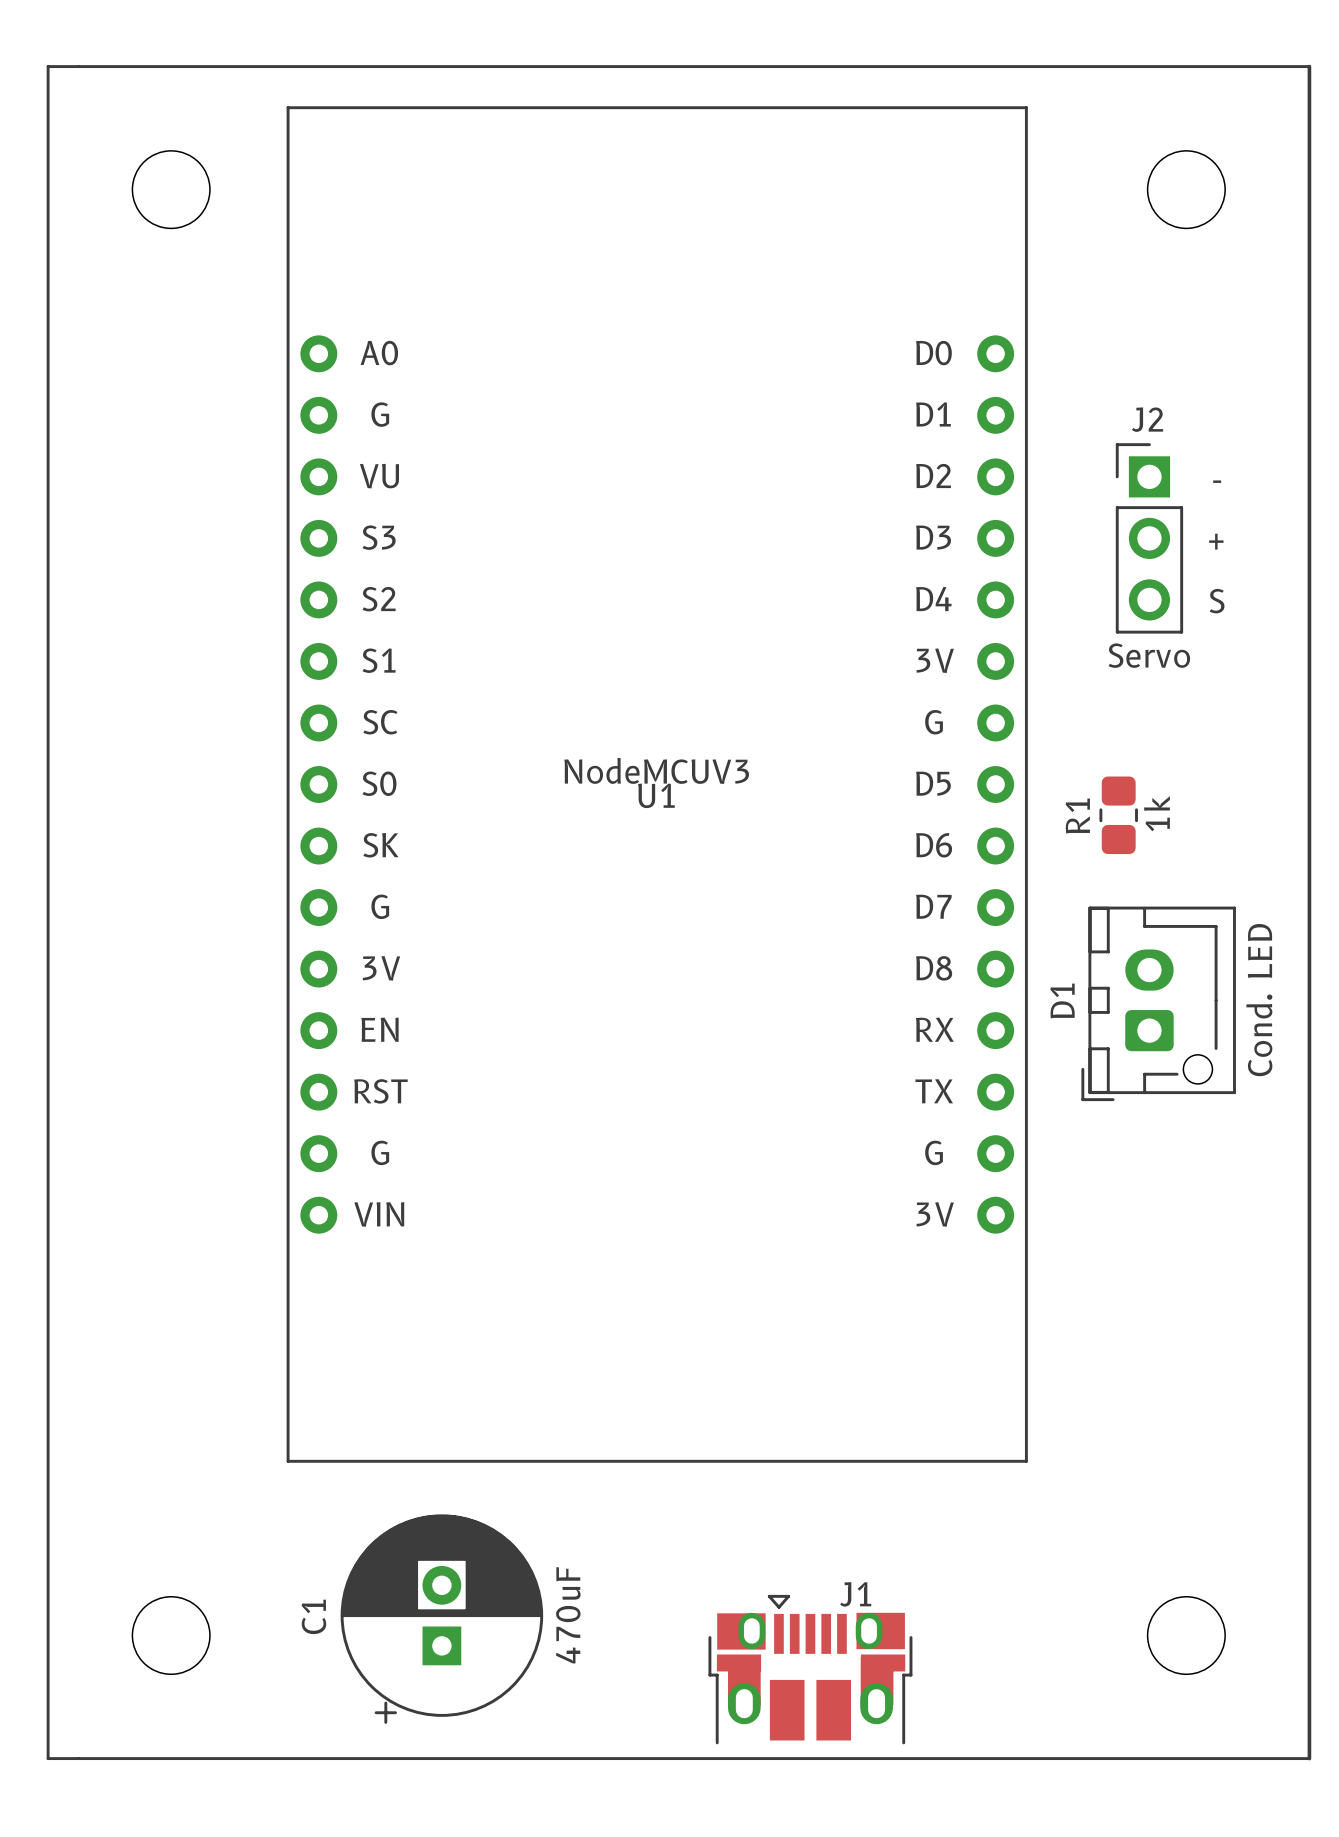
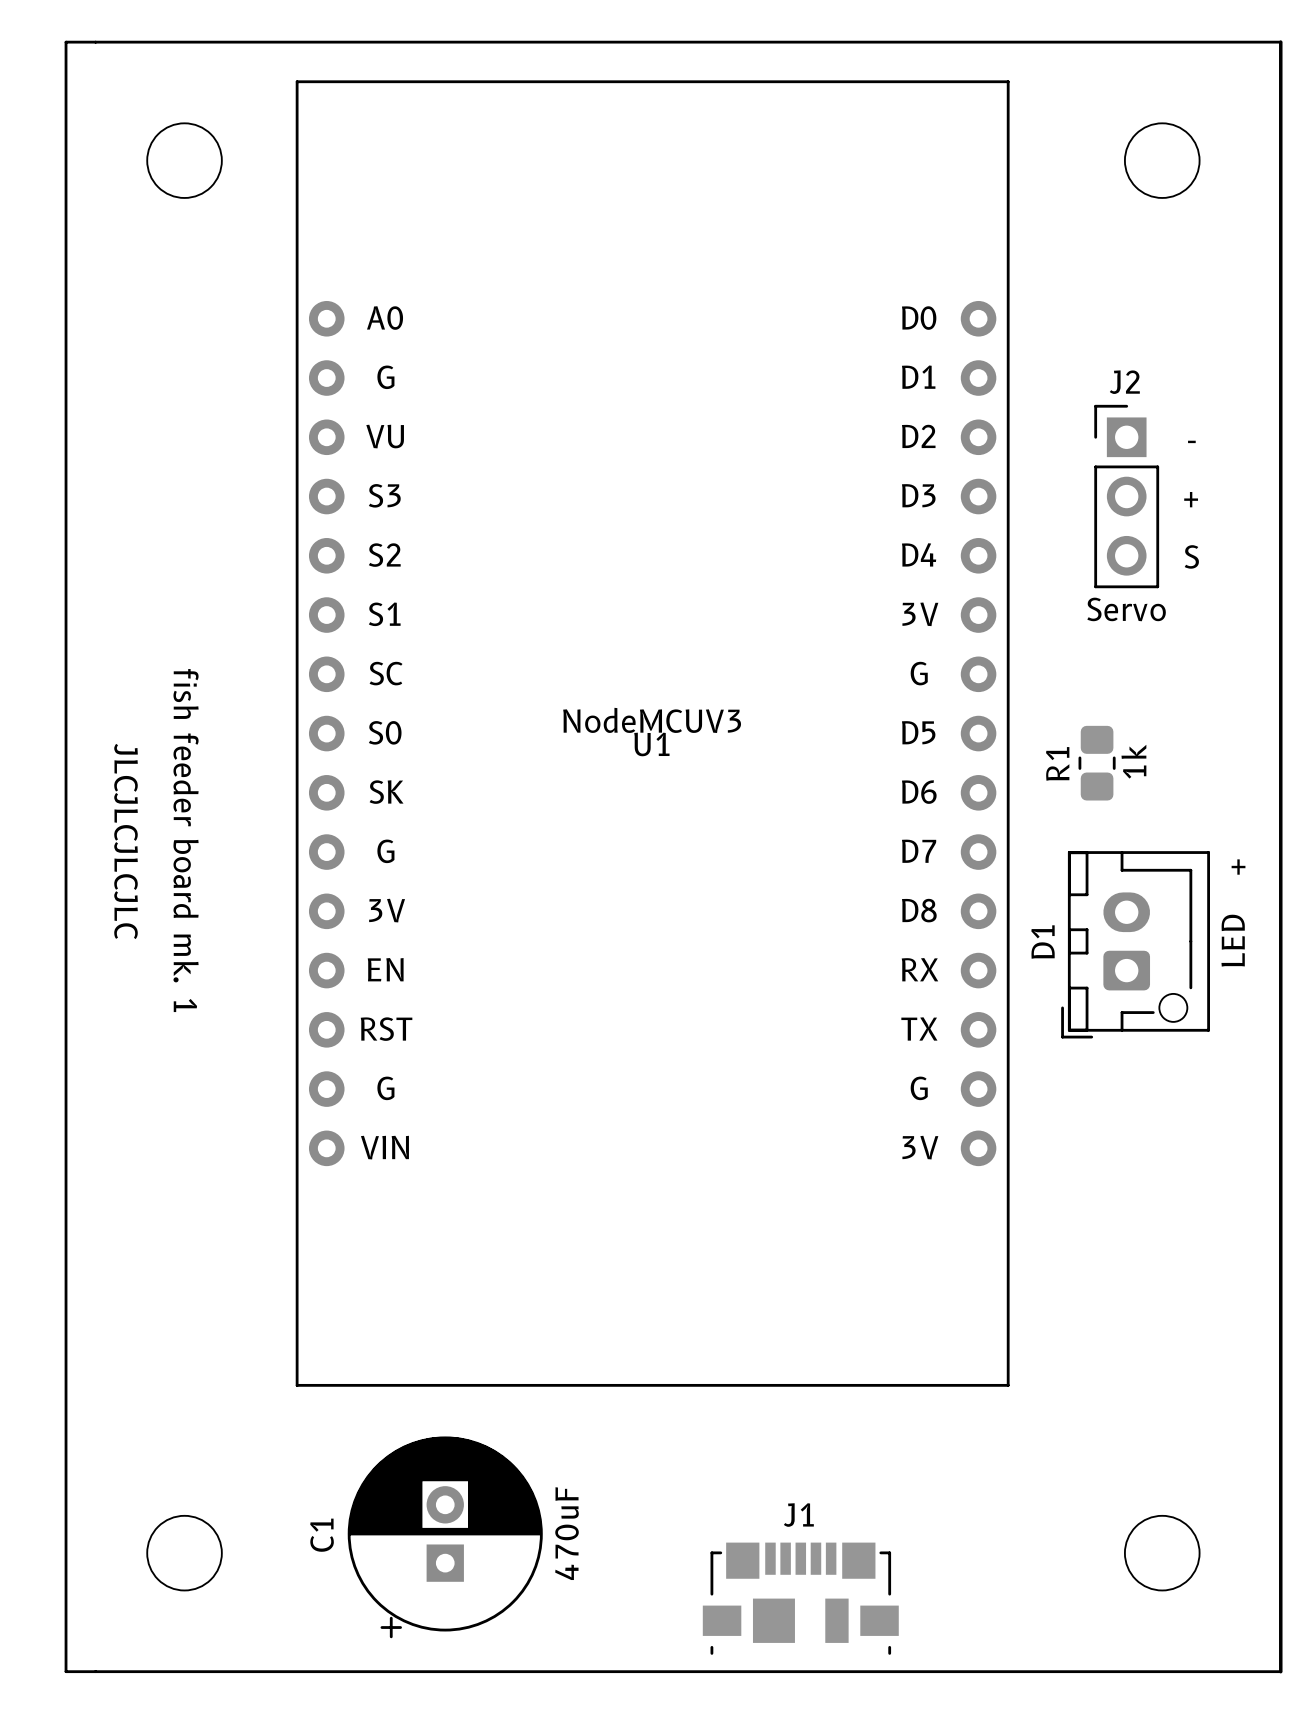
text: none -> fish feeder board mk. 1 (186, 840)
text: none -> JLCJLCJLCJLC (126, 841)
text: none -> + (1238, 867)
D1 value: Cond. LED (1259, 1000) -> LED (1233, 940)
J1 footprint: [708, 1594, 913, 1745] -> [702, 1542, 899, 1655]
J1 name position: J1 (855, 1594) -> J1 (798, 1515)

